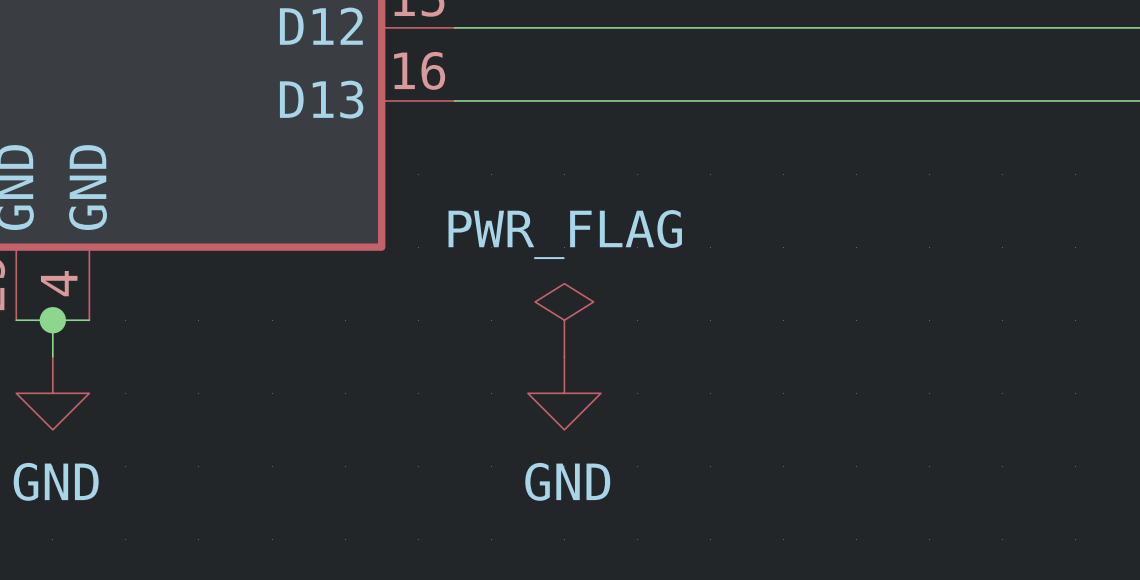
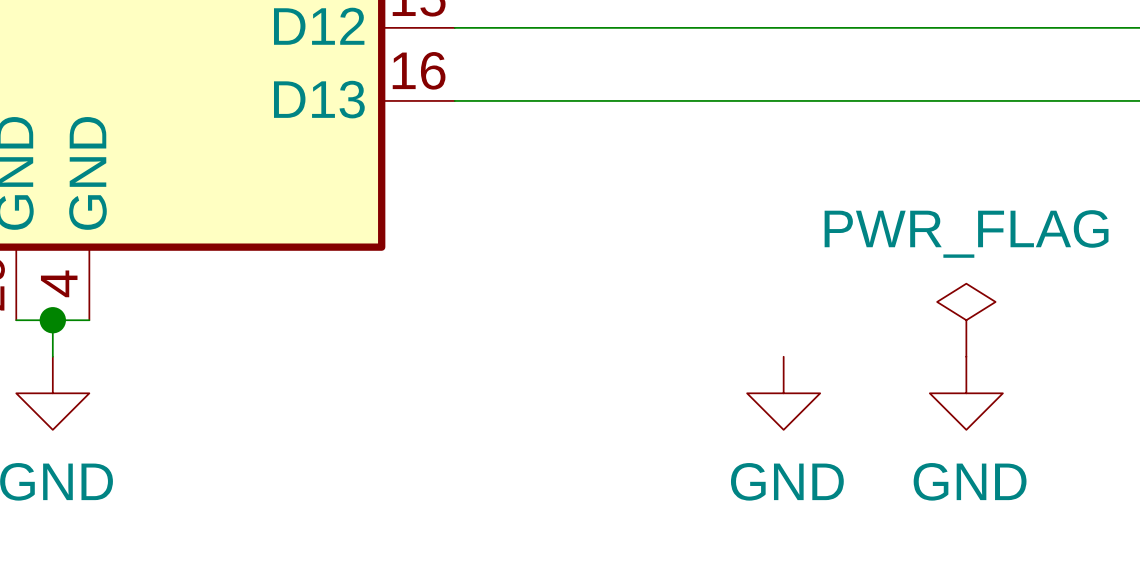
power symbol position: PWR_FLAG (564, 320) -> PWR_FLAG (966, 320)
power symbol: GND (564, 393) -> none
power symbol: none -> GND (783, 393)
power symbol: none -> GND (966, 393)

